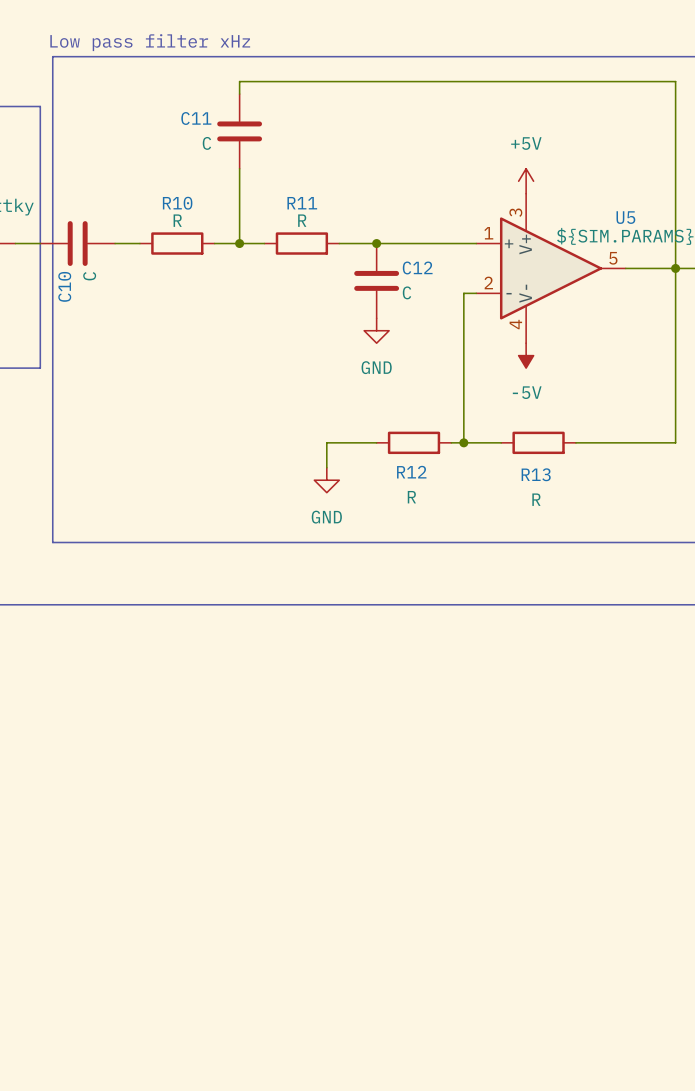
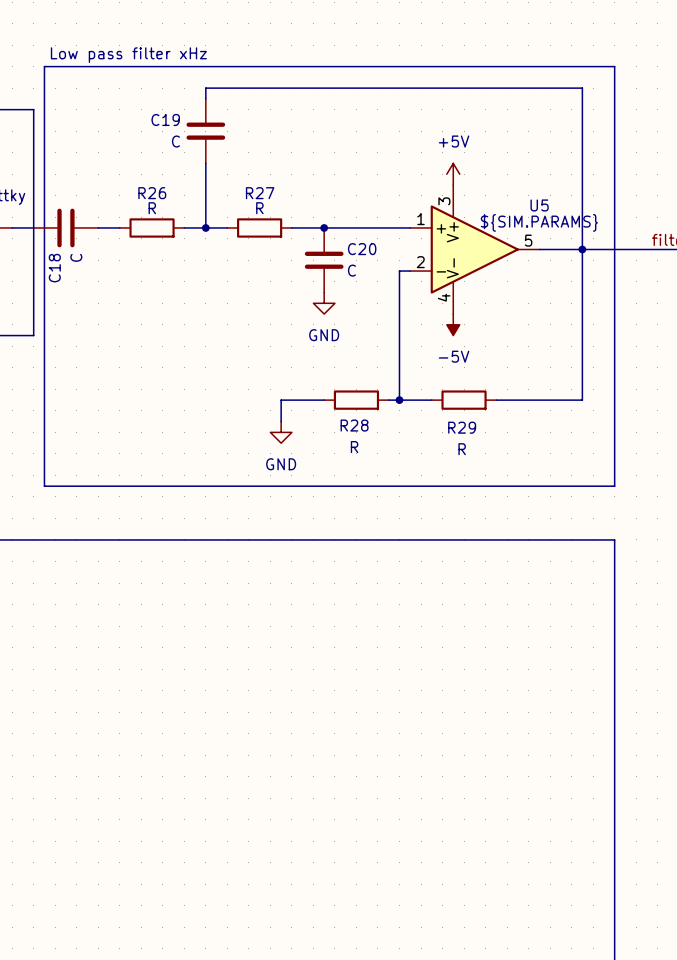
C11 name: C11 (196, 118) -> C19 (165, 120)
R10 name: R10 (177, 203) -> R26 (152, 193)
R11 name: R11 (302, 203) -> R27 (260, 193)
C12 name: C12 (417, 267) -> C20 (362, 249)
C10 name: C10 (64, 286) -> C18 (54, 268)
R12 name: R12 (411, 472) -> R28 (354, 425)
R13 name: R13 (536, 474) -> R29 (462, 427)

